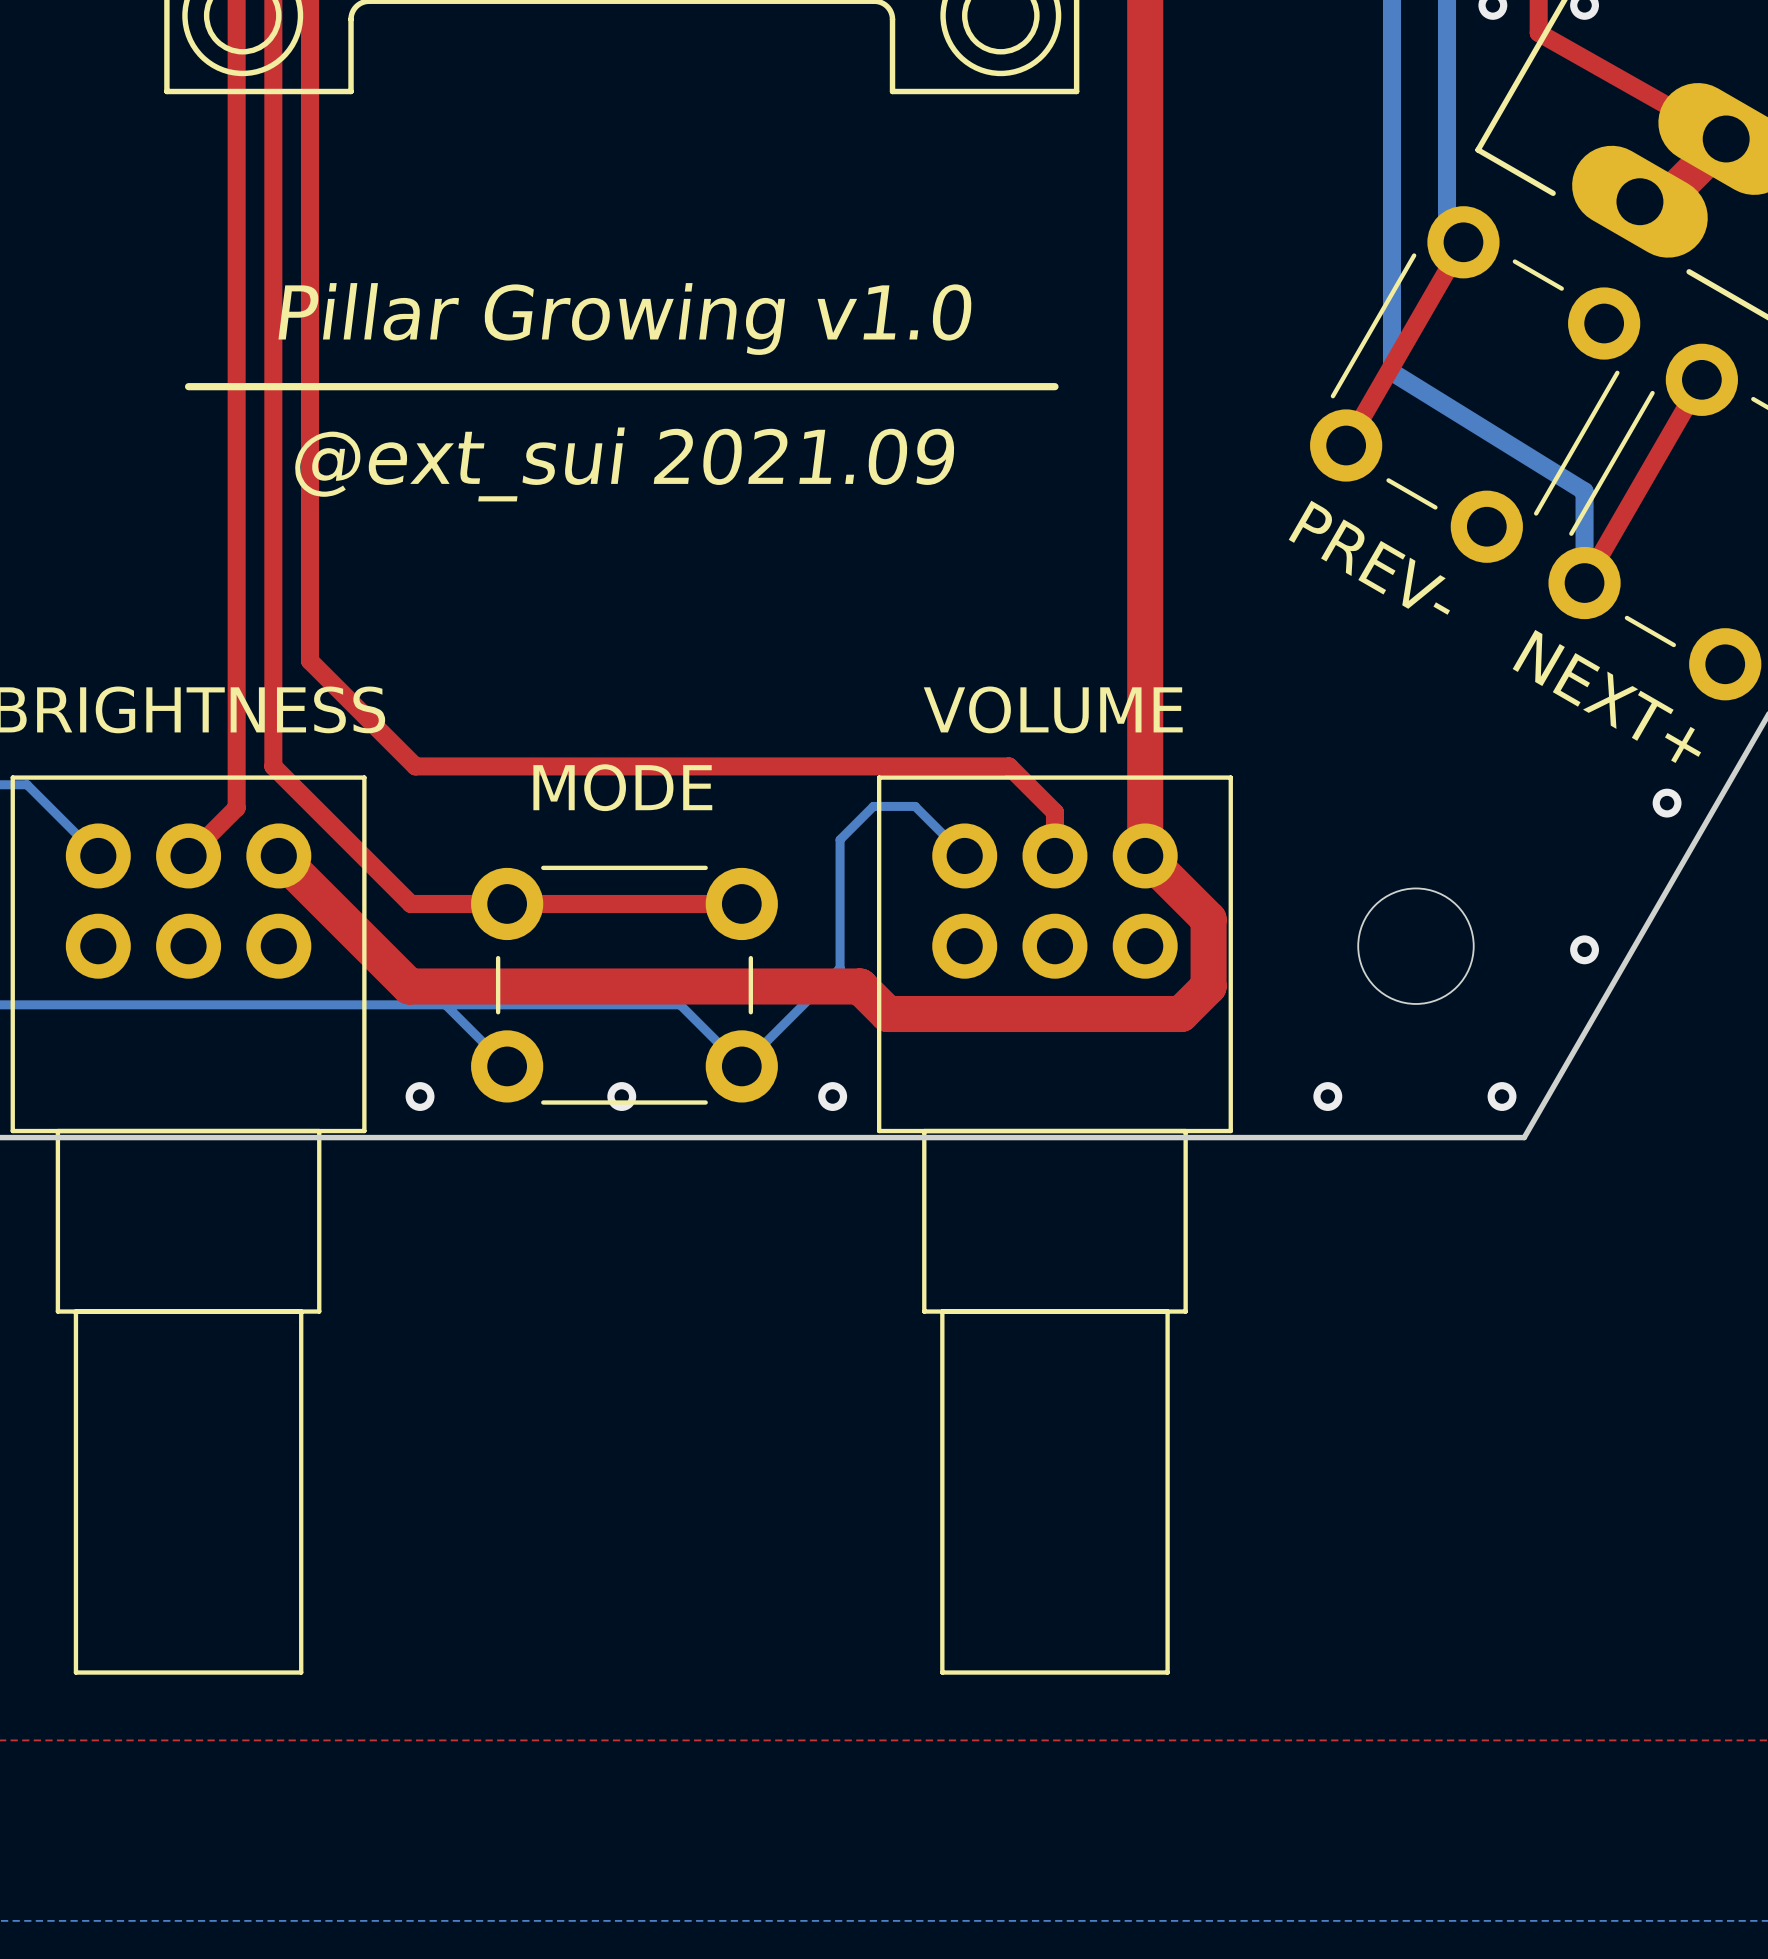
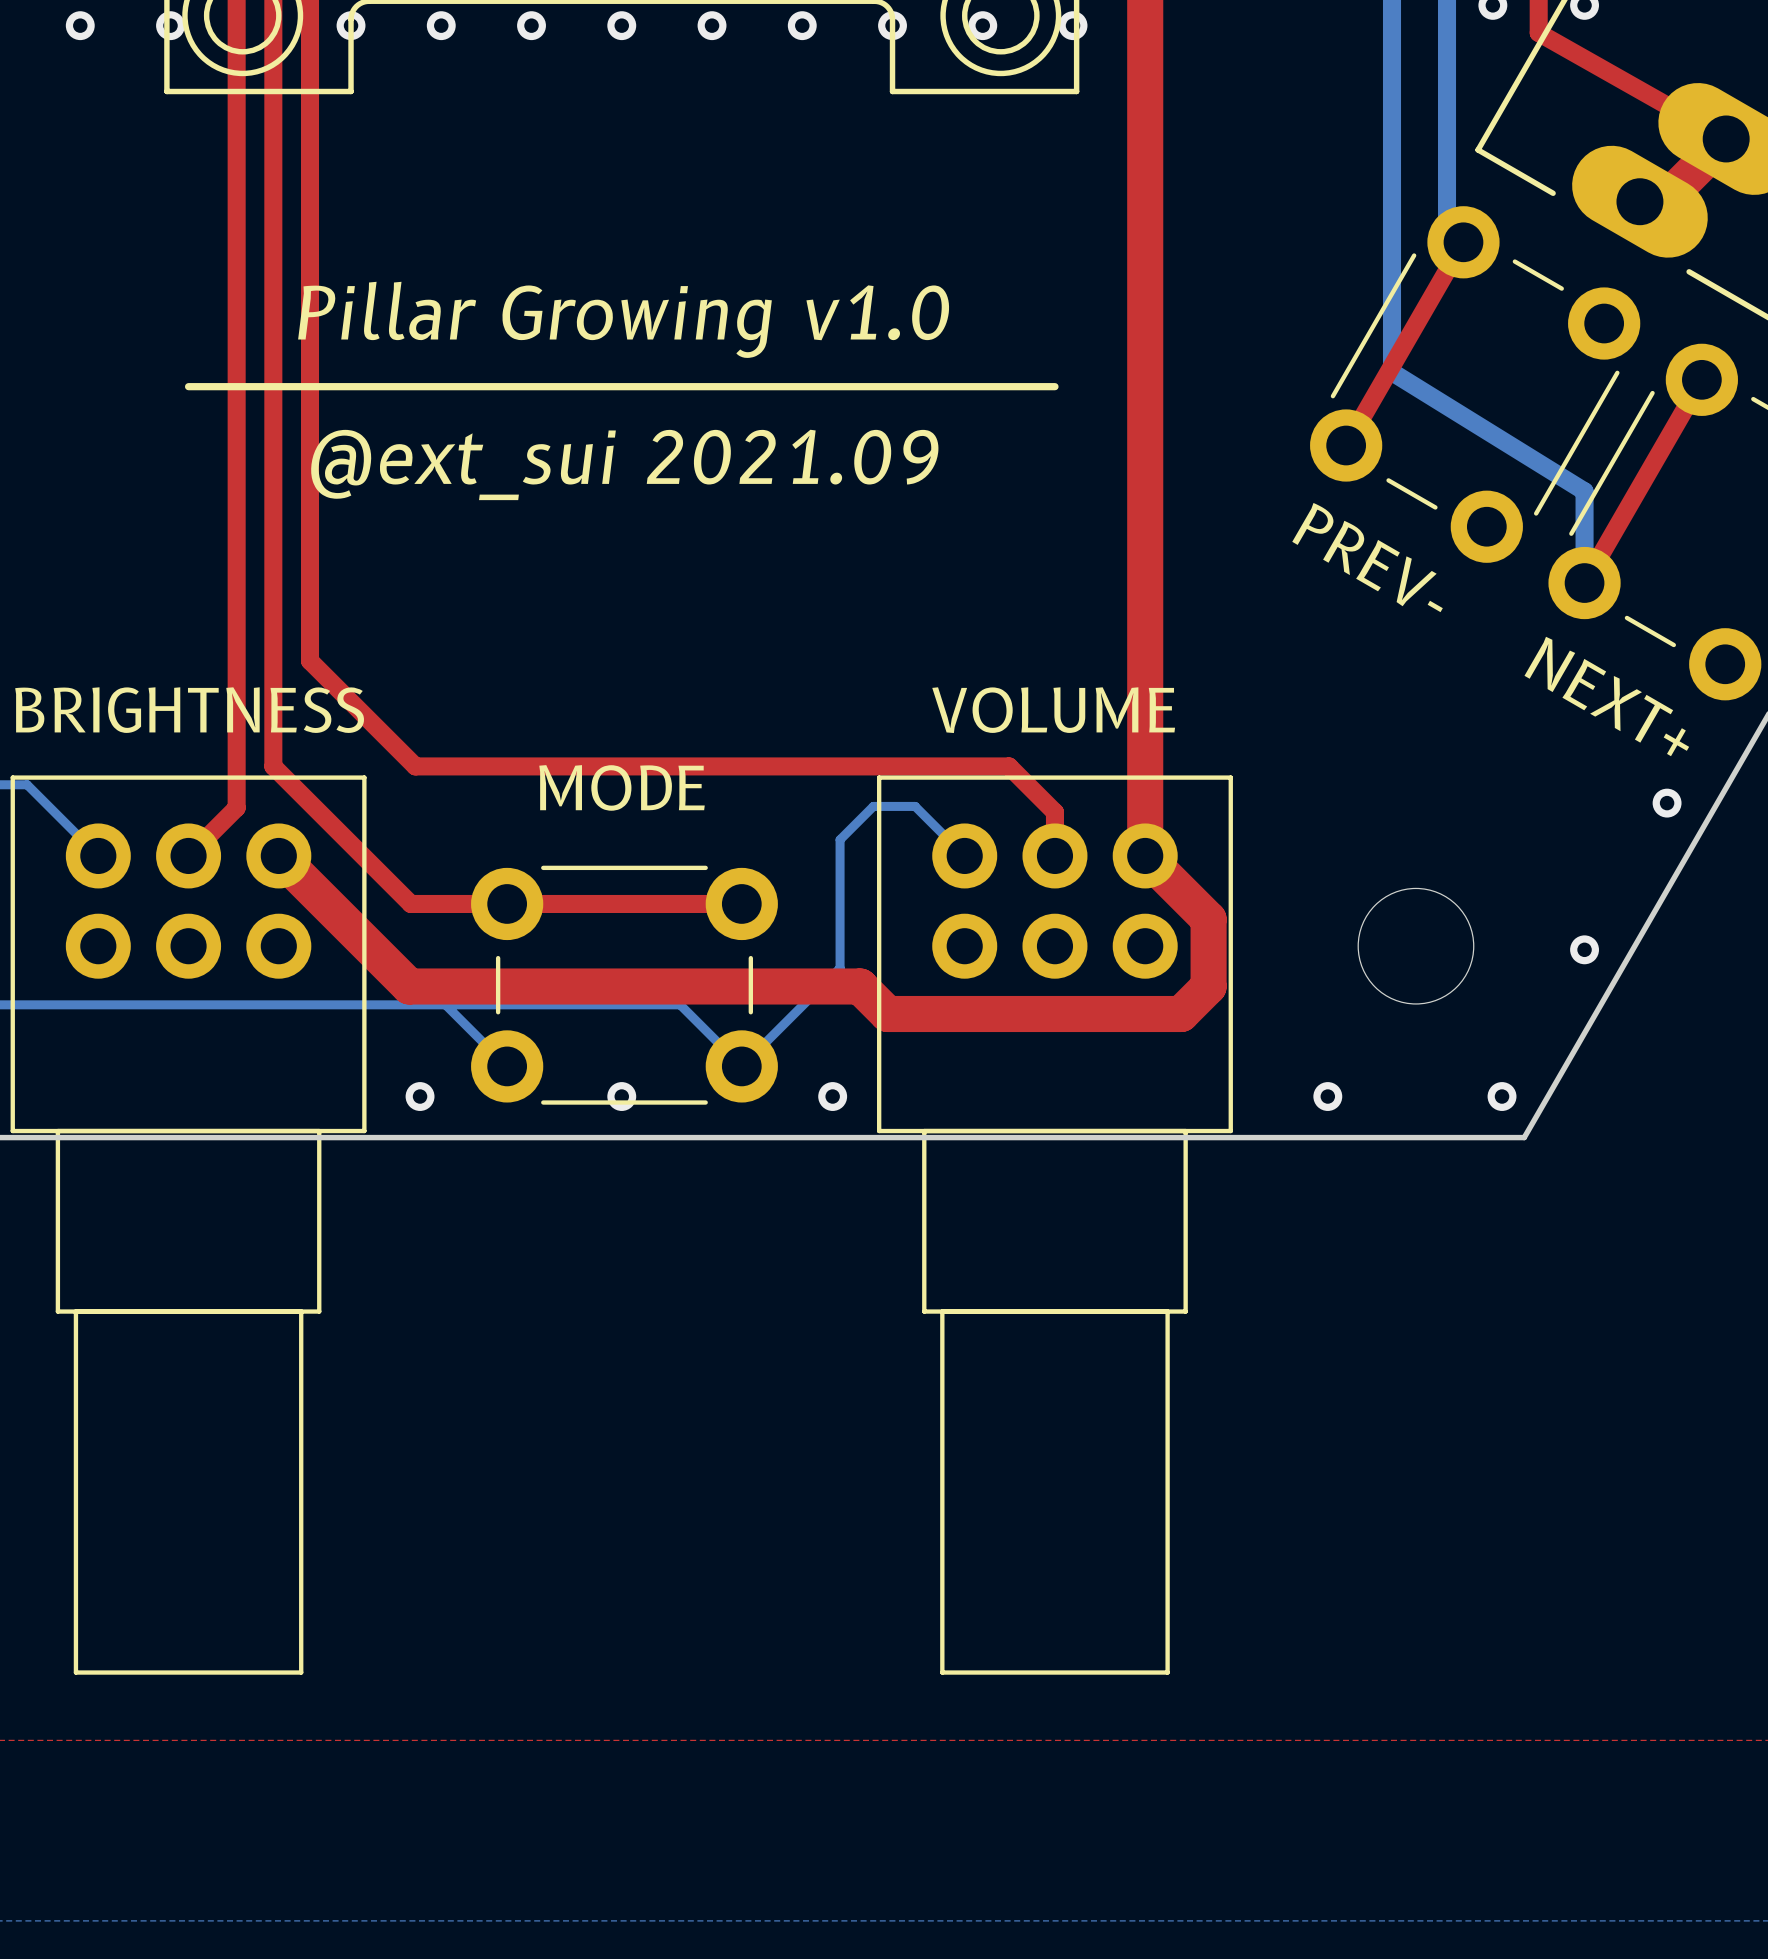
via: none -> (80, 25)
via: none -> (170, 25)
via: none -> (351, 25)
via: none -> (441, 25)
via: none -> (531, 25)
via: none -> (621, 25)
via: none -> (712, 25)
via: none -> (802, 25)
via: none -> (892, 25)
via: none -> (982, 25)
via: none -> (1073, 25)

